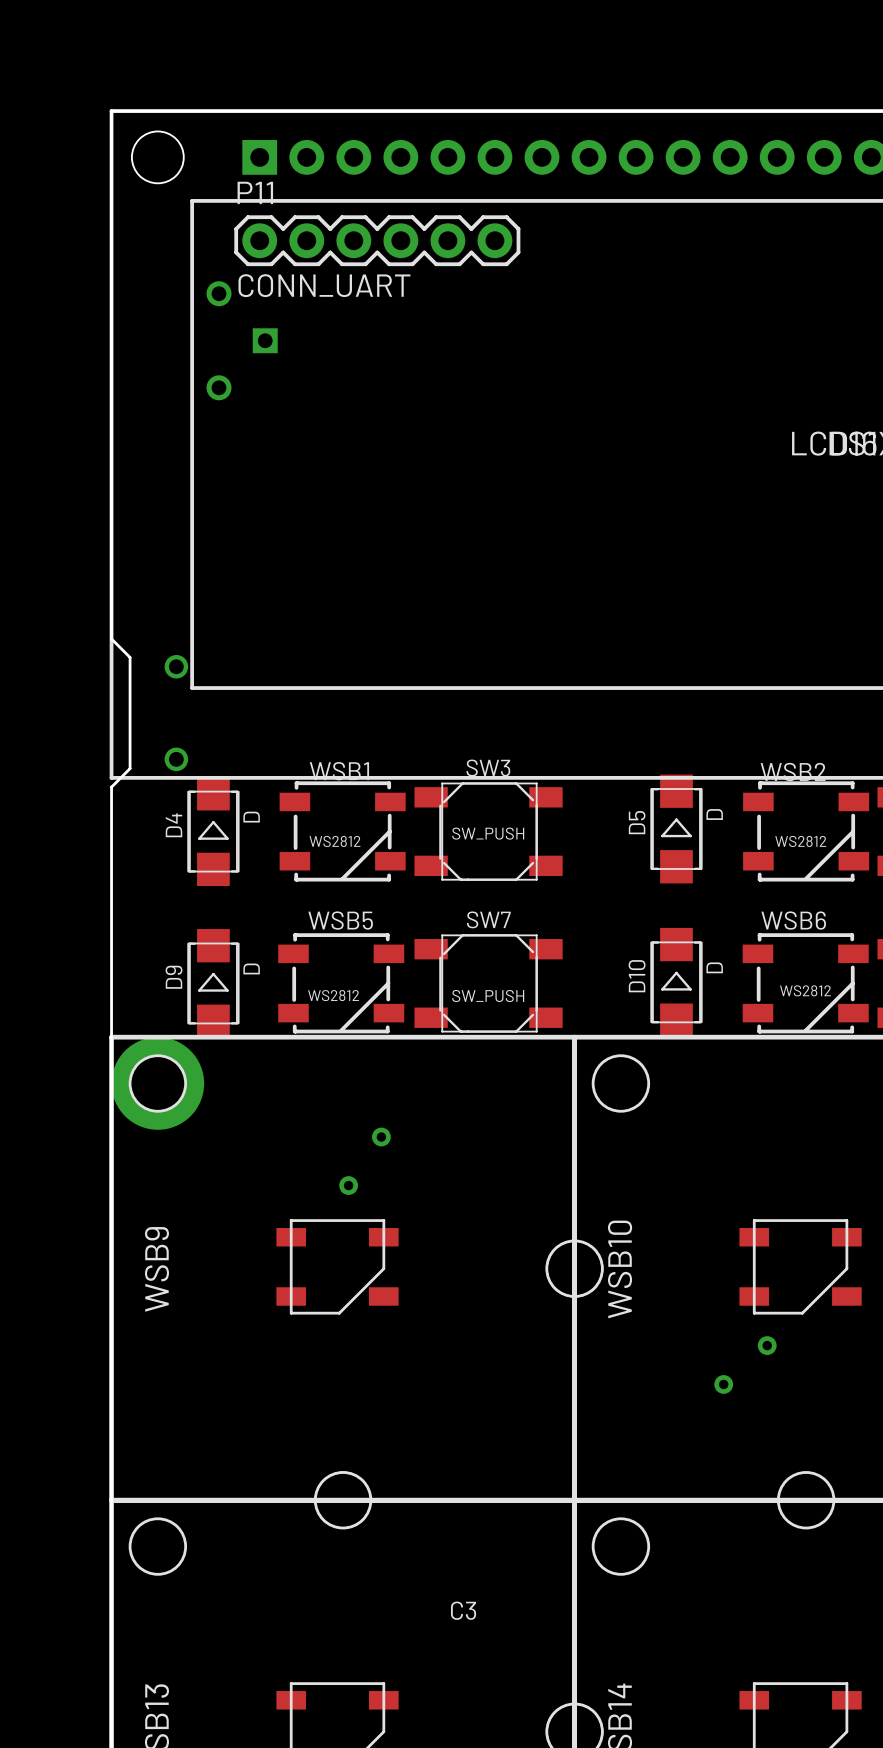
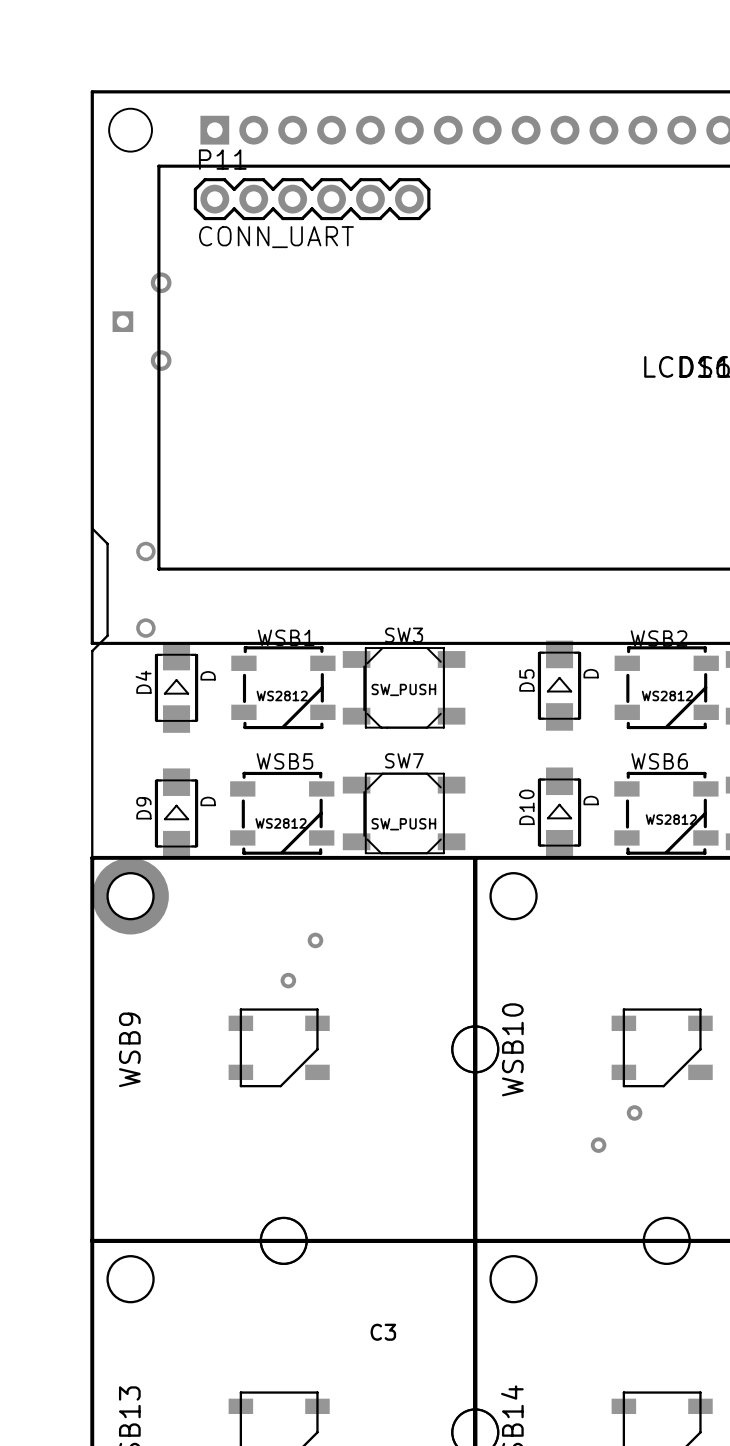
part rotation: 0° (242, 340) -> 180° (142, 321)
part position: (242, 340) -> (142, 321)

